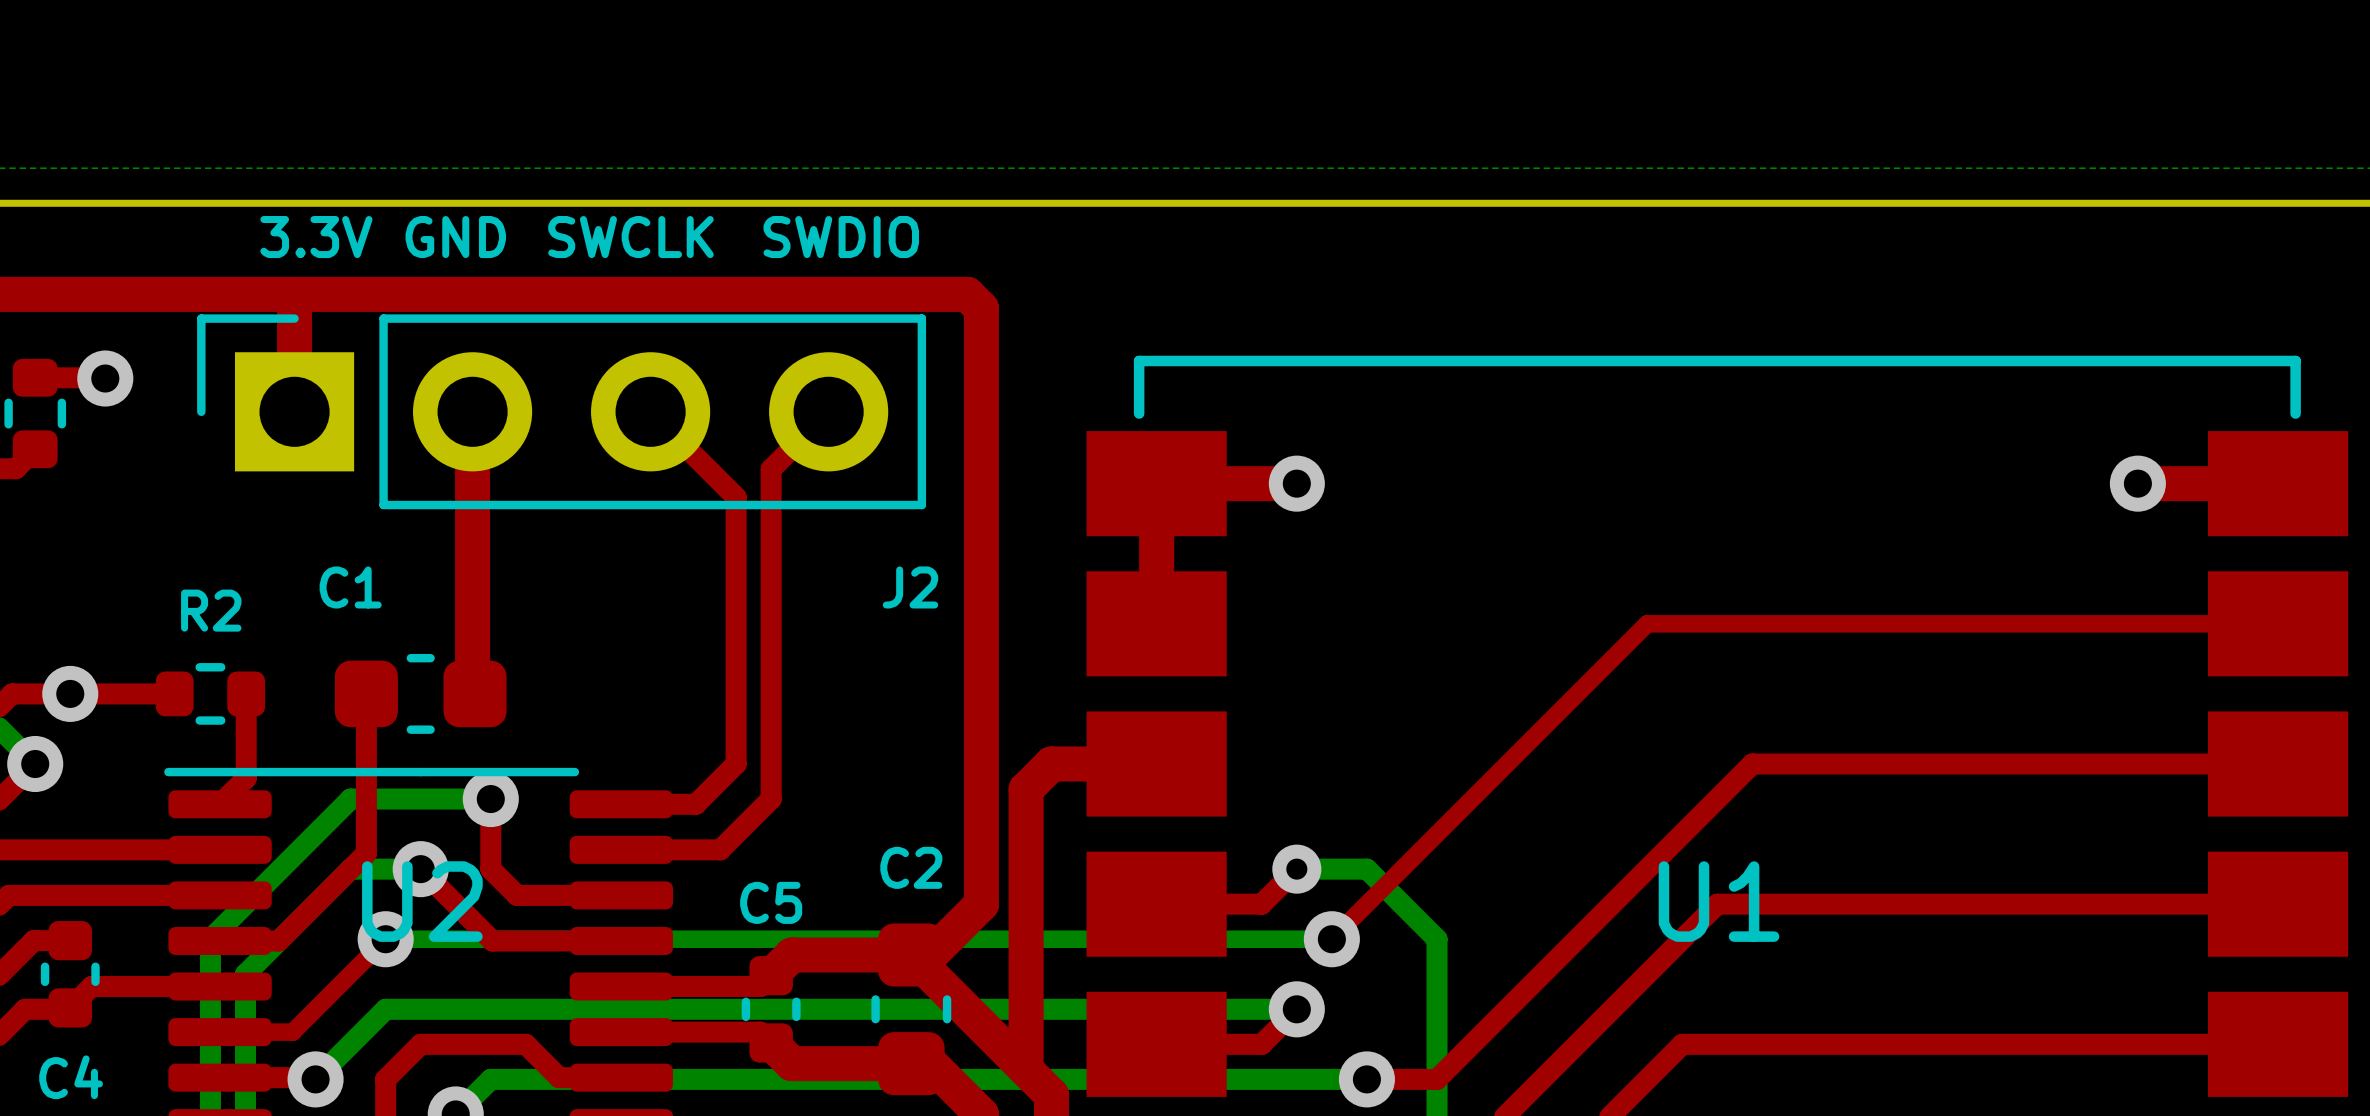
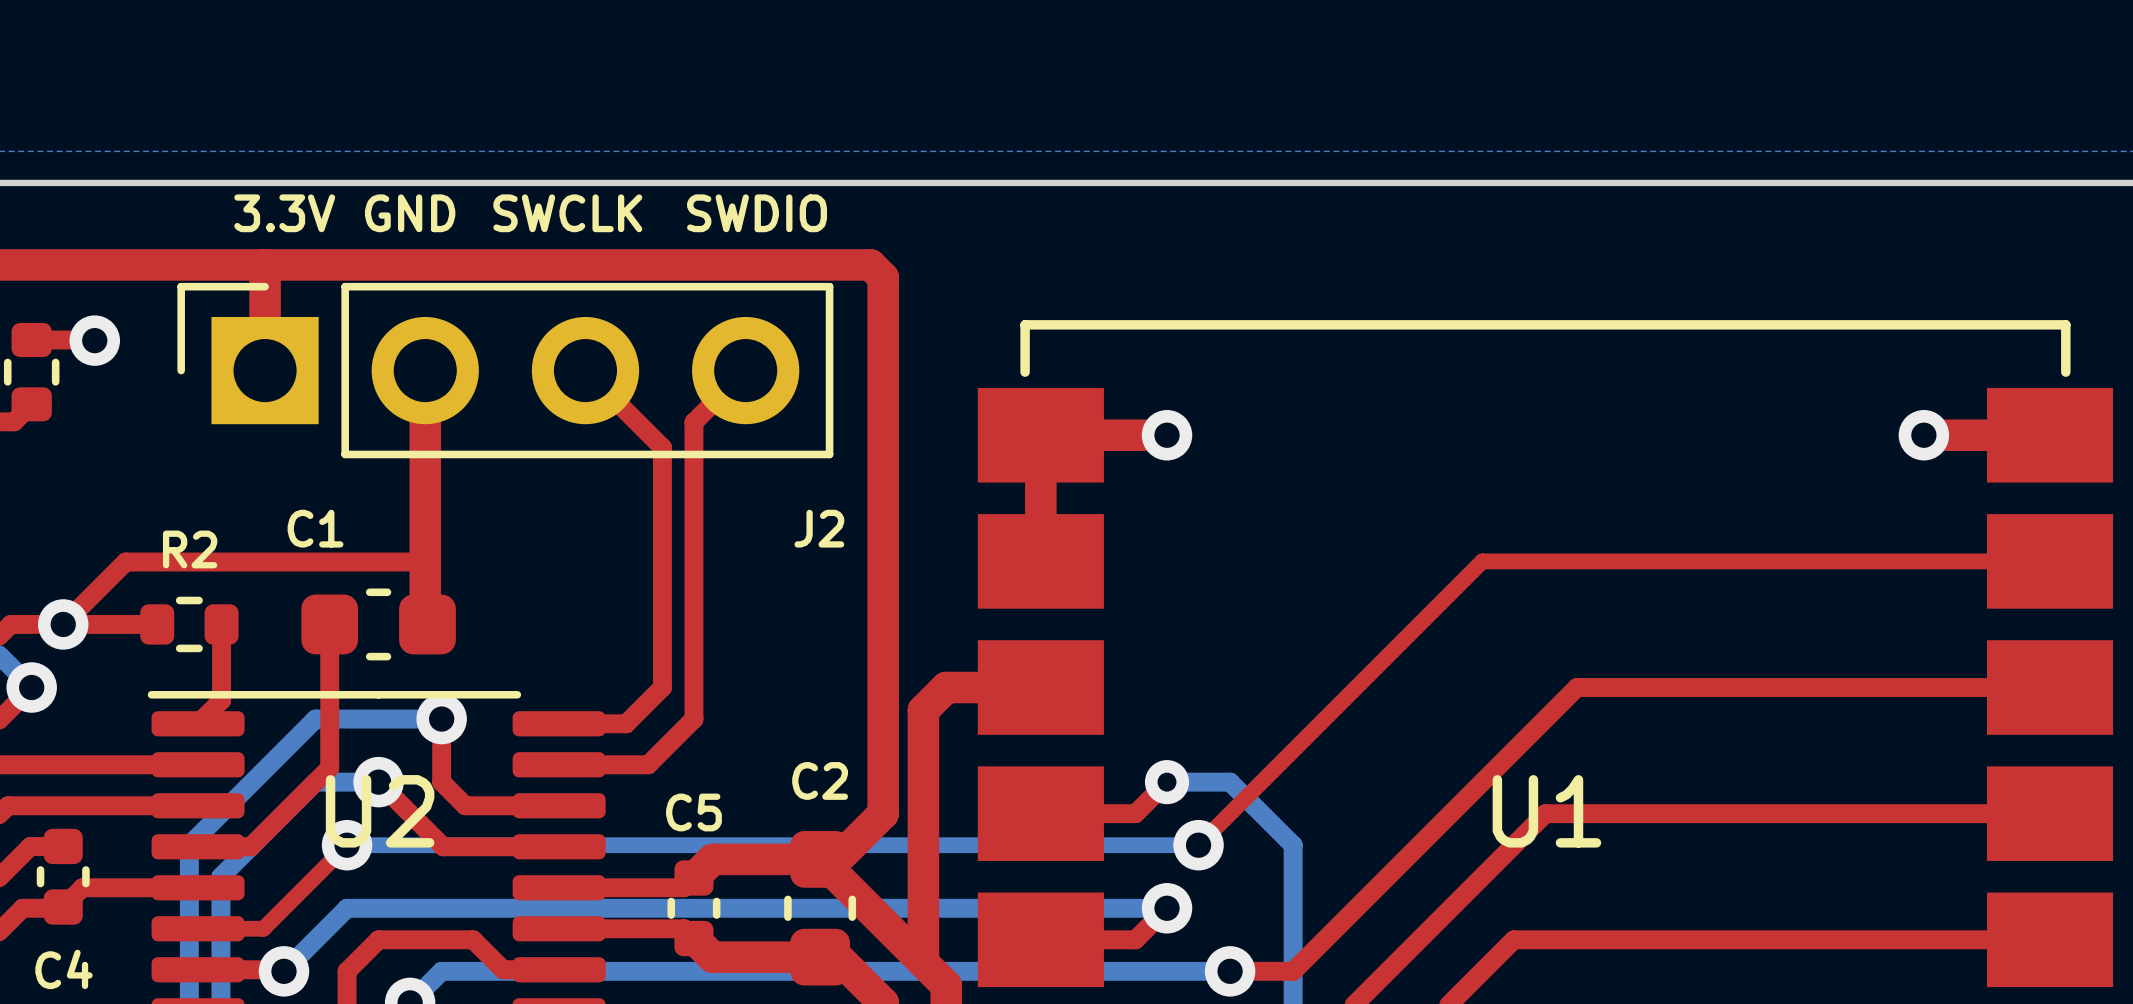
top track: none -> (425, 562) (125, 562) (63, 624)

